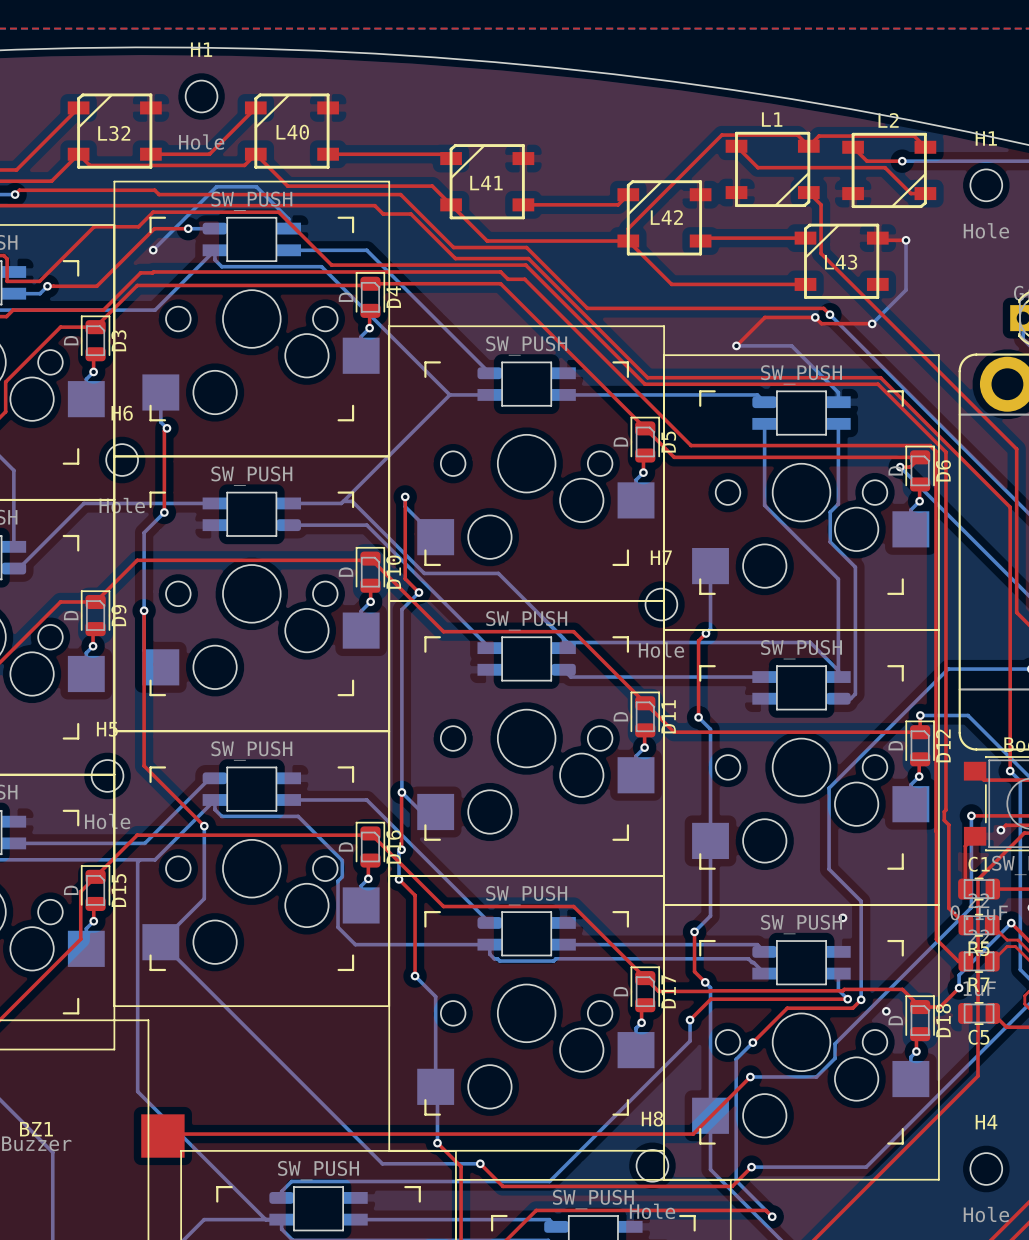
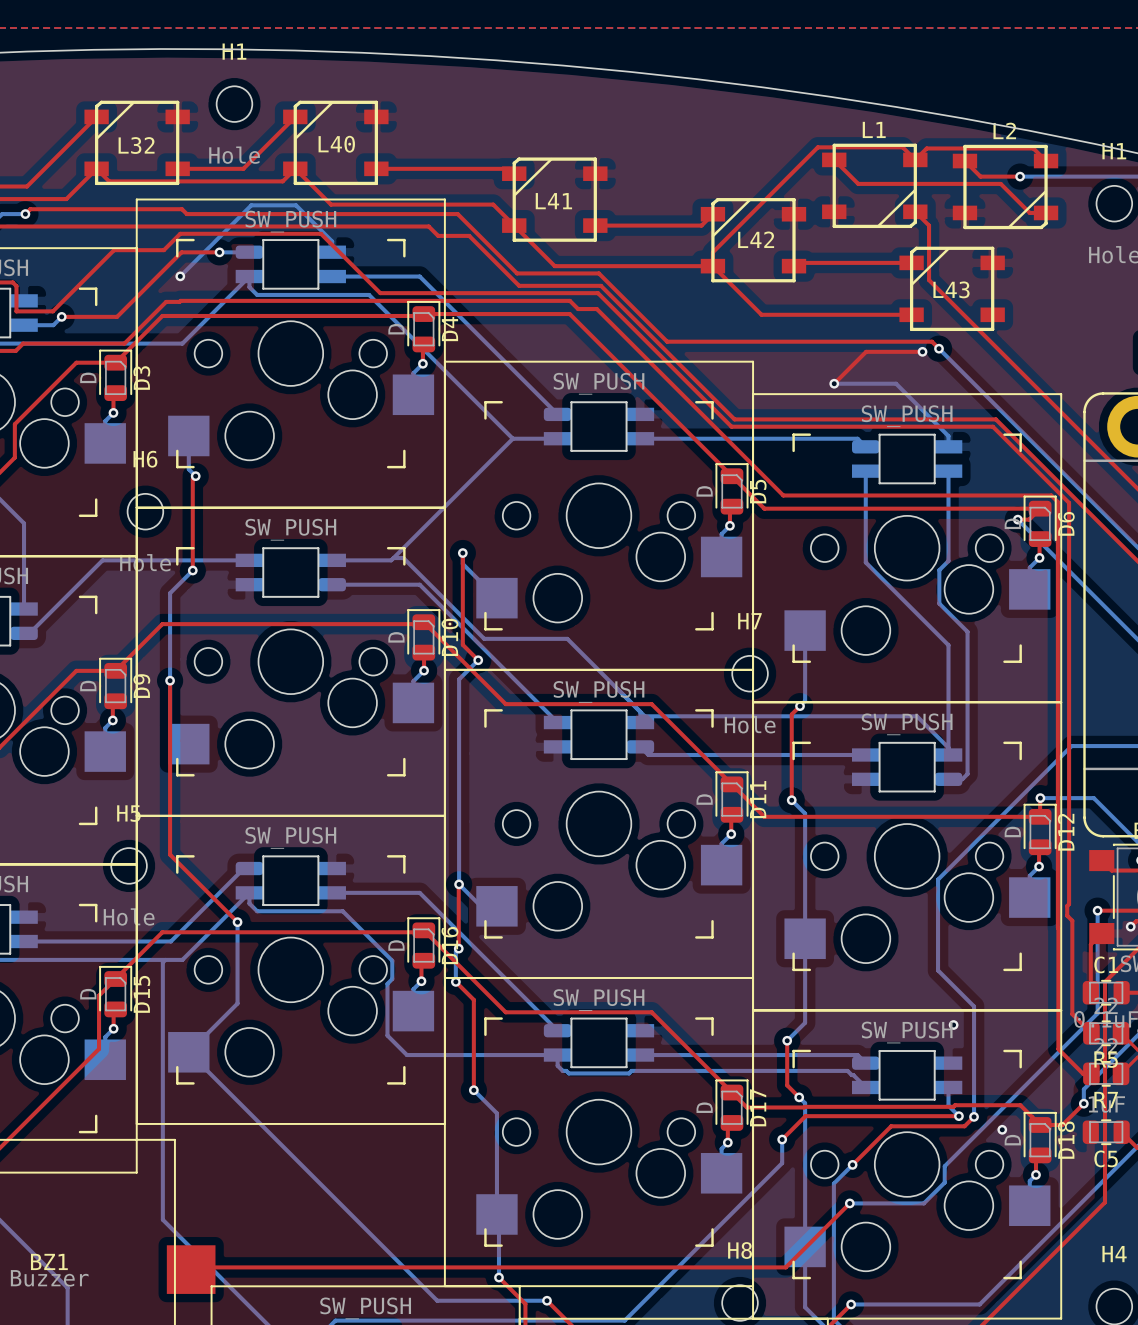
top track: (877, 238) (879, 240) (906, 240) -> none
bottom track: (906, 240) (906, 290) (872, 323) -> none
via: (906, 240) -> none
top track: (815, 317) (821, 323) (872, 323) -> none
via: (872, 323) -> none

